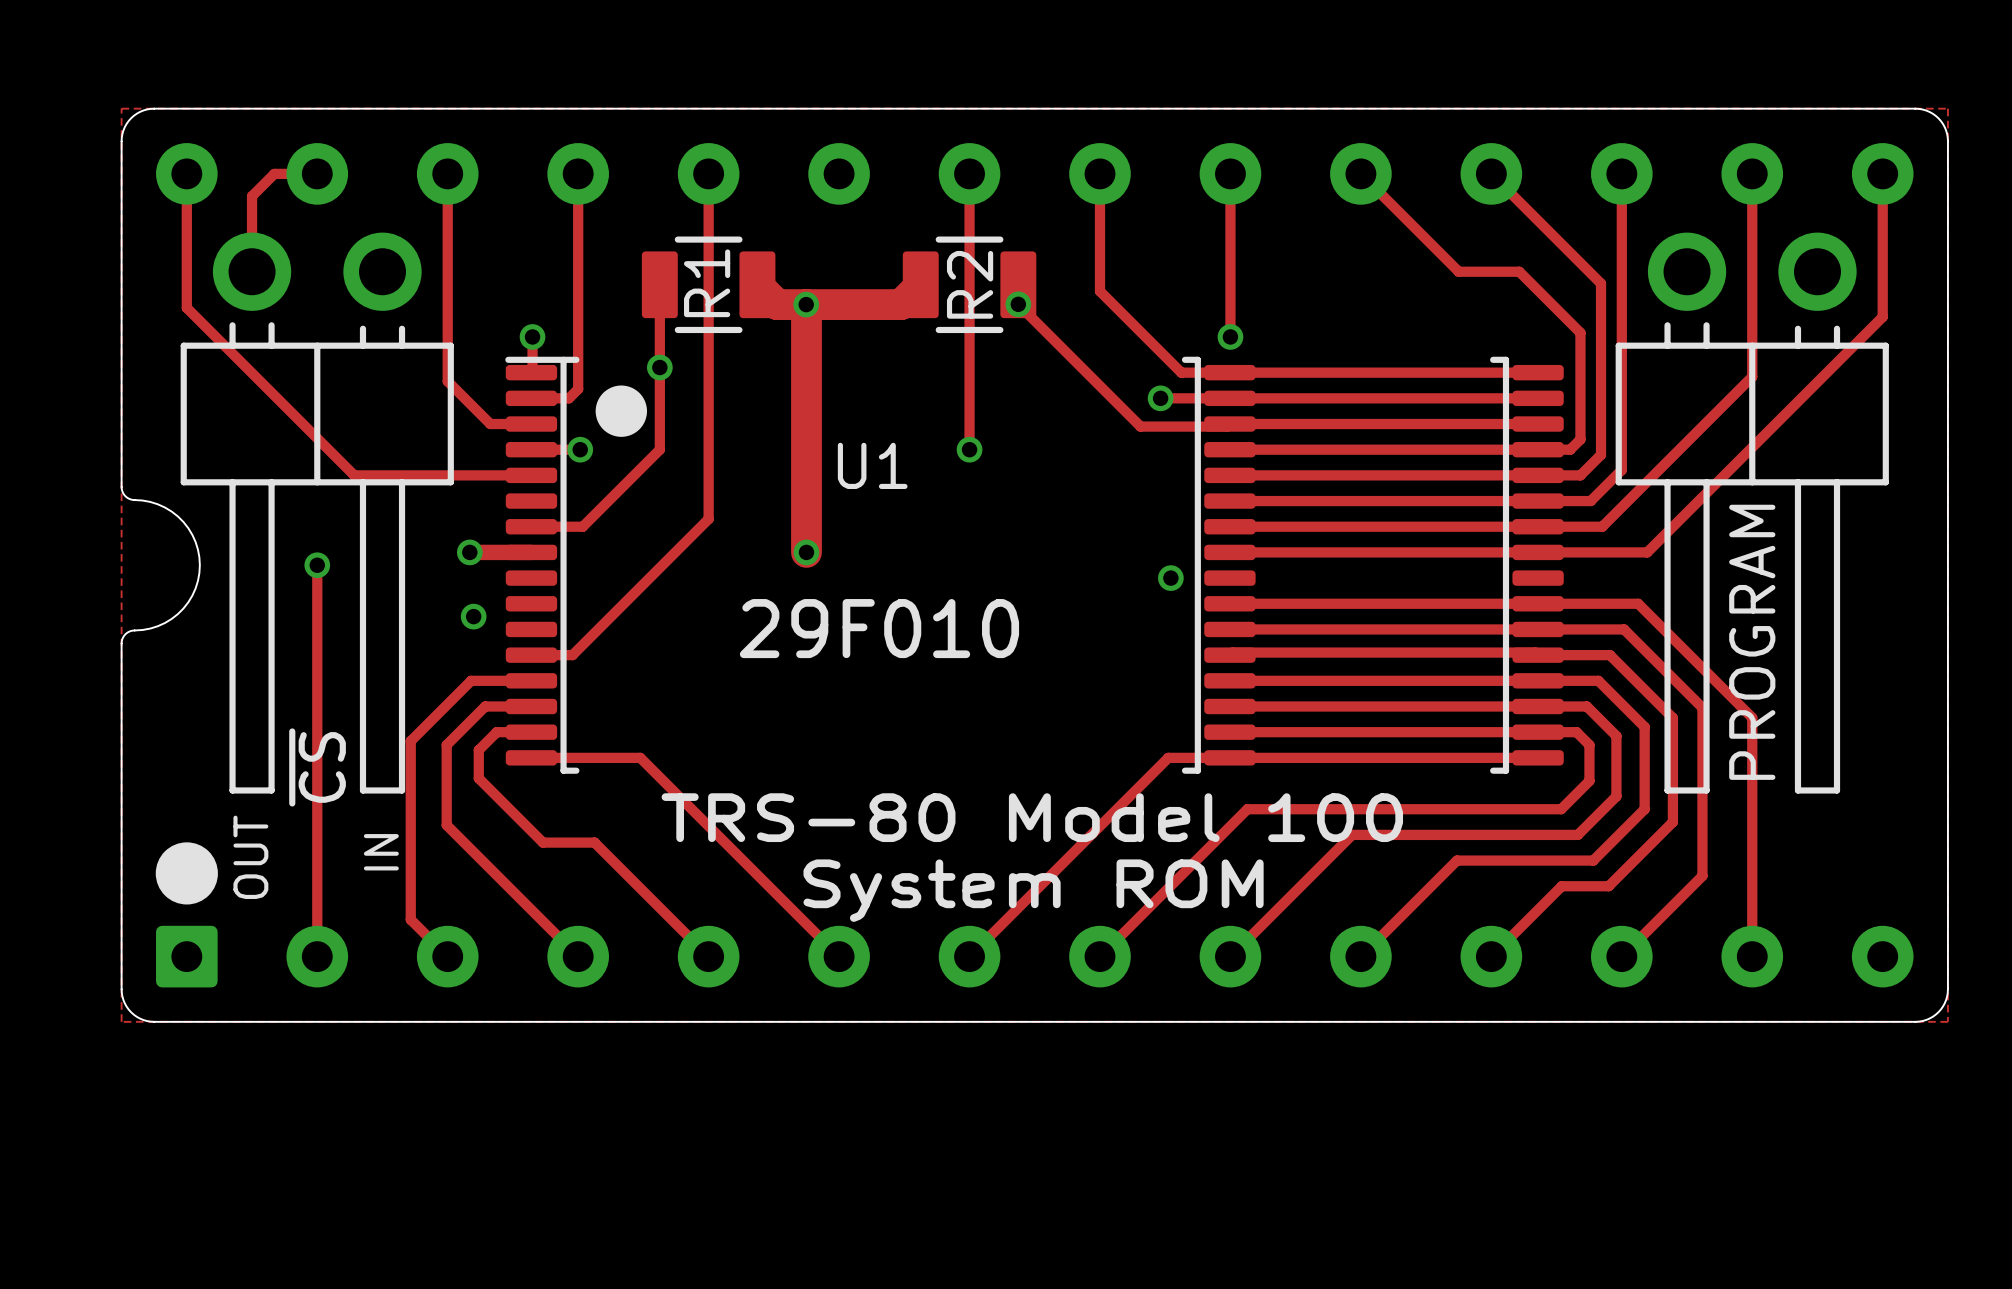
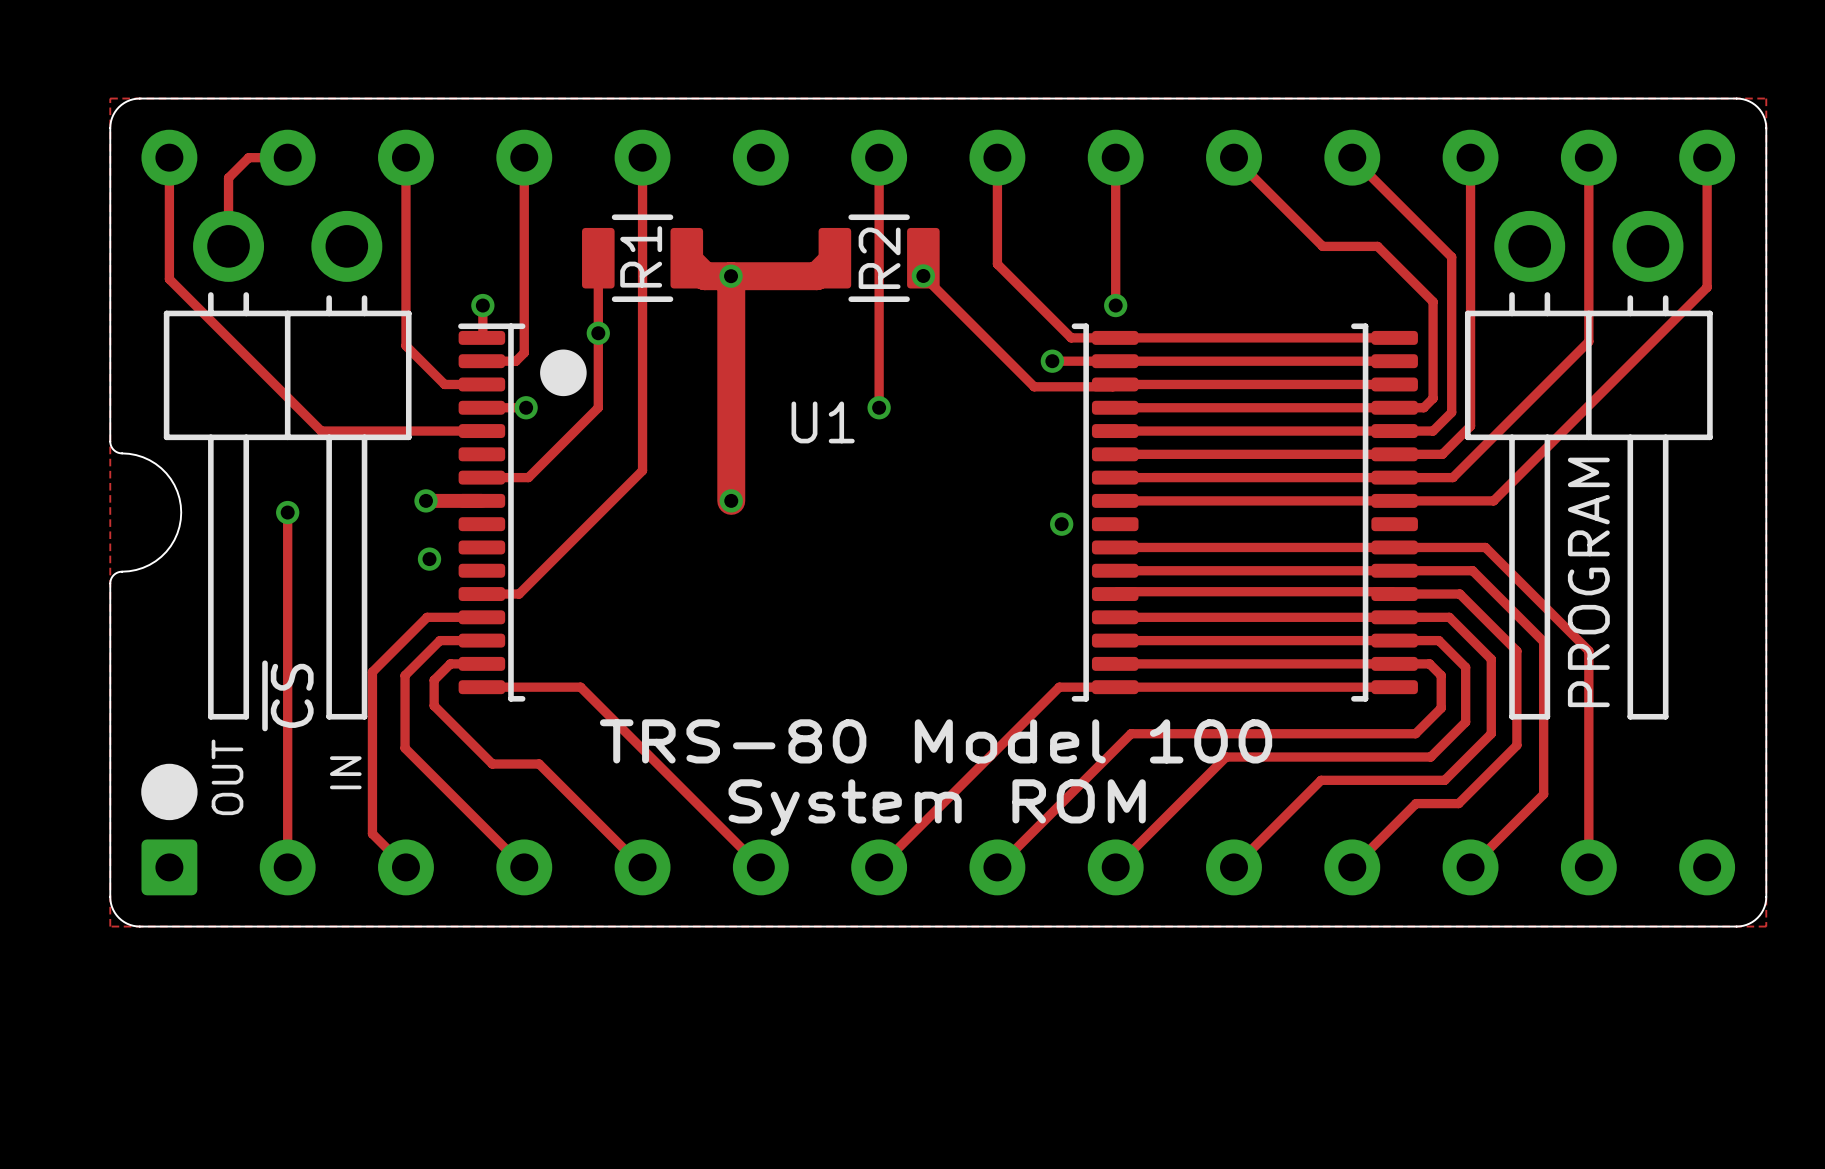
U1 name position: U1 (872, 465) -> U1 (823, 422)
U1 value: 29F010 (879, 628) -> none

